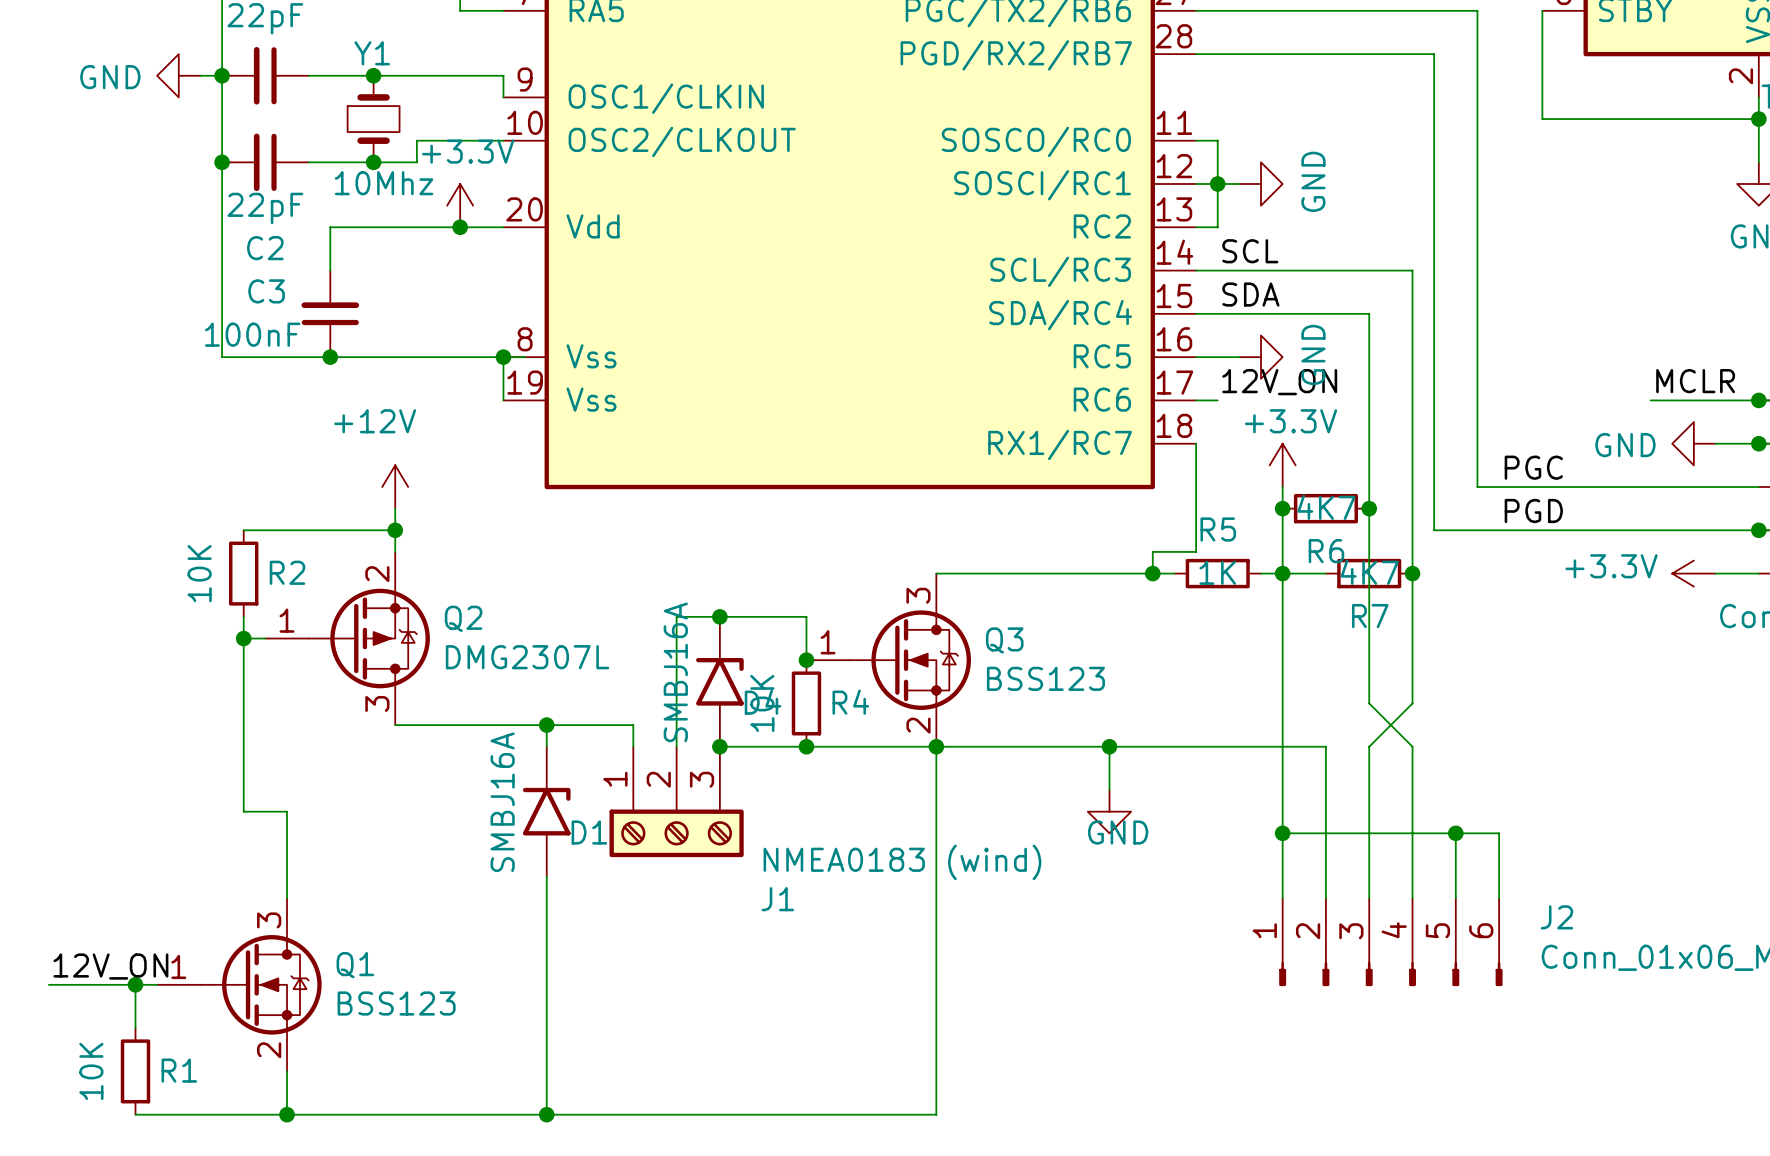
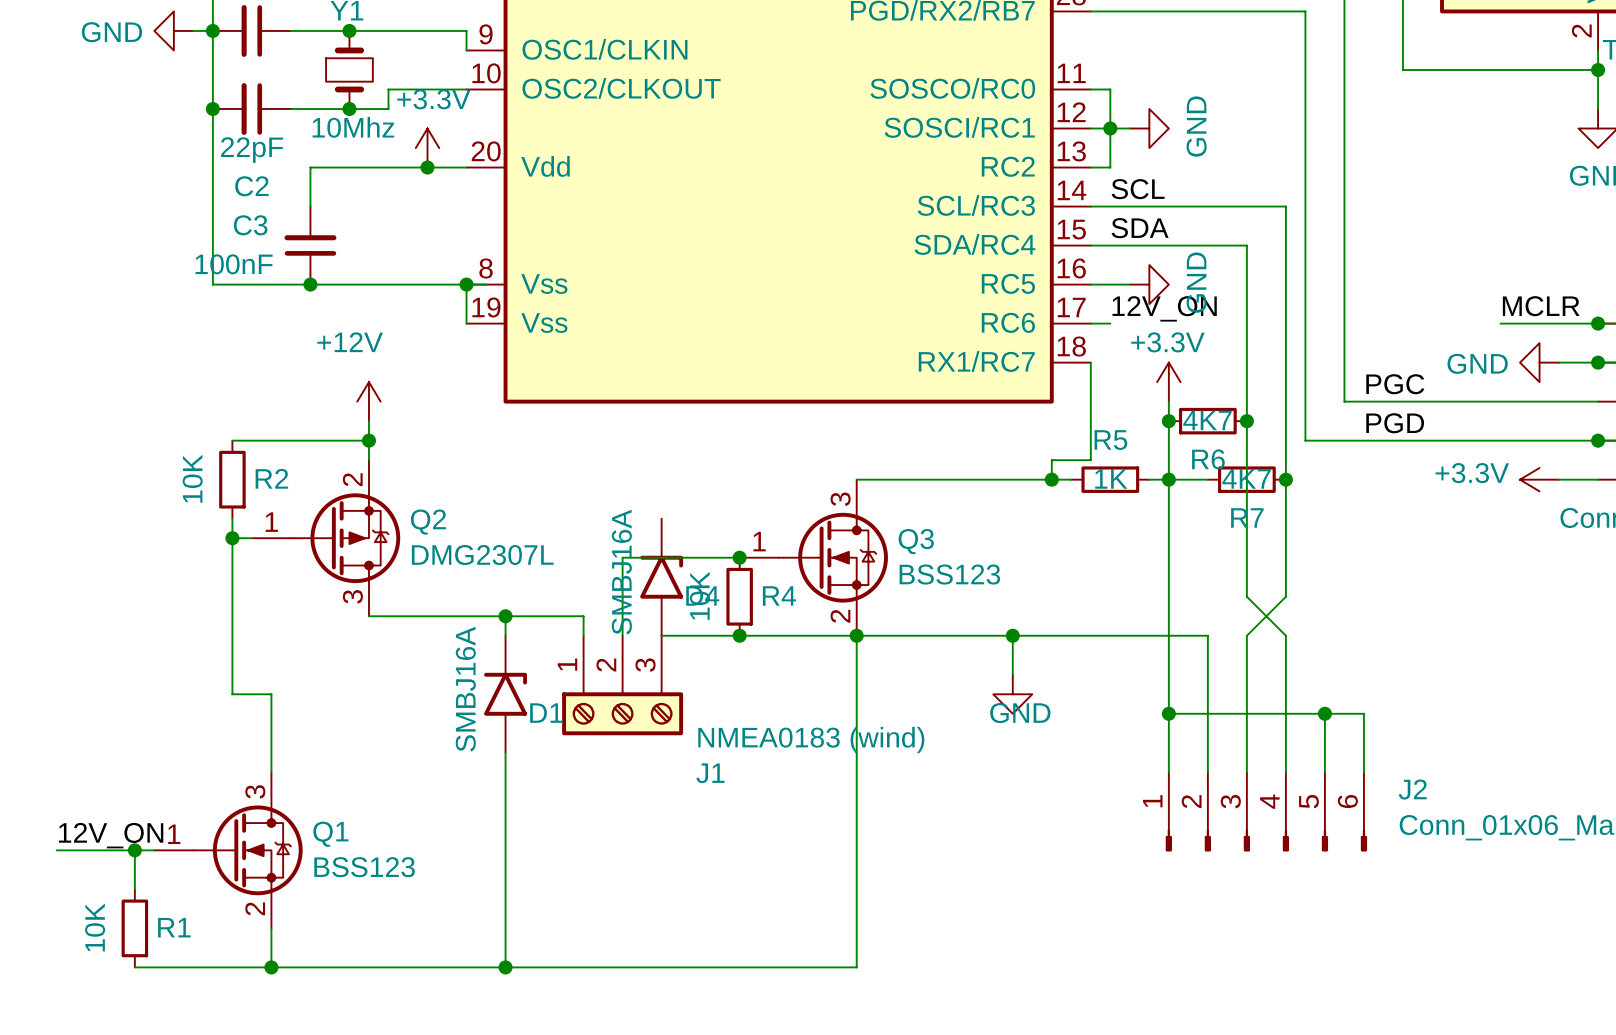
junction: (719, 616) -> none
wire: (676, 660) (676, 616) (806, 616) (806, 660) -> (622, 557) (739, 557)
junction: (719, 746) -> none

